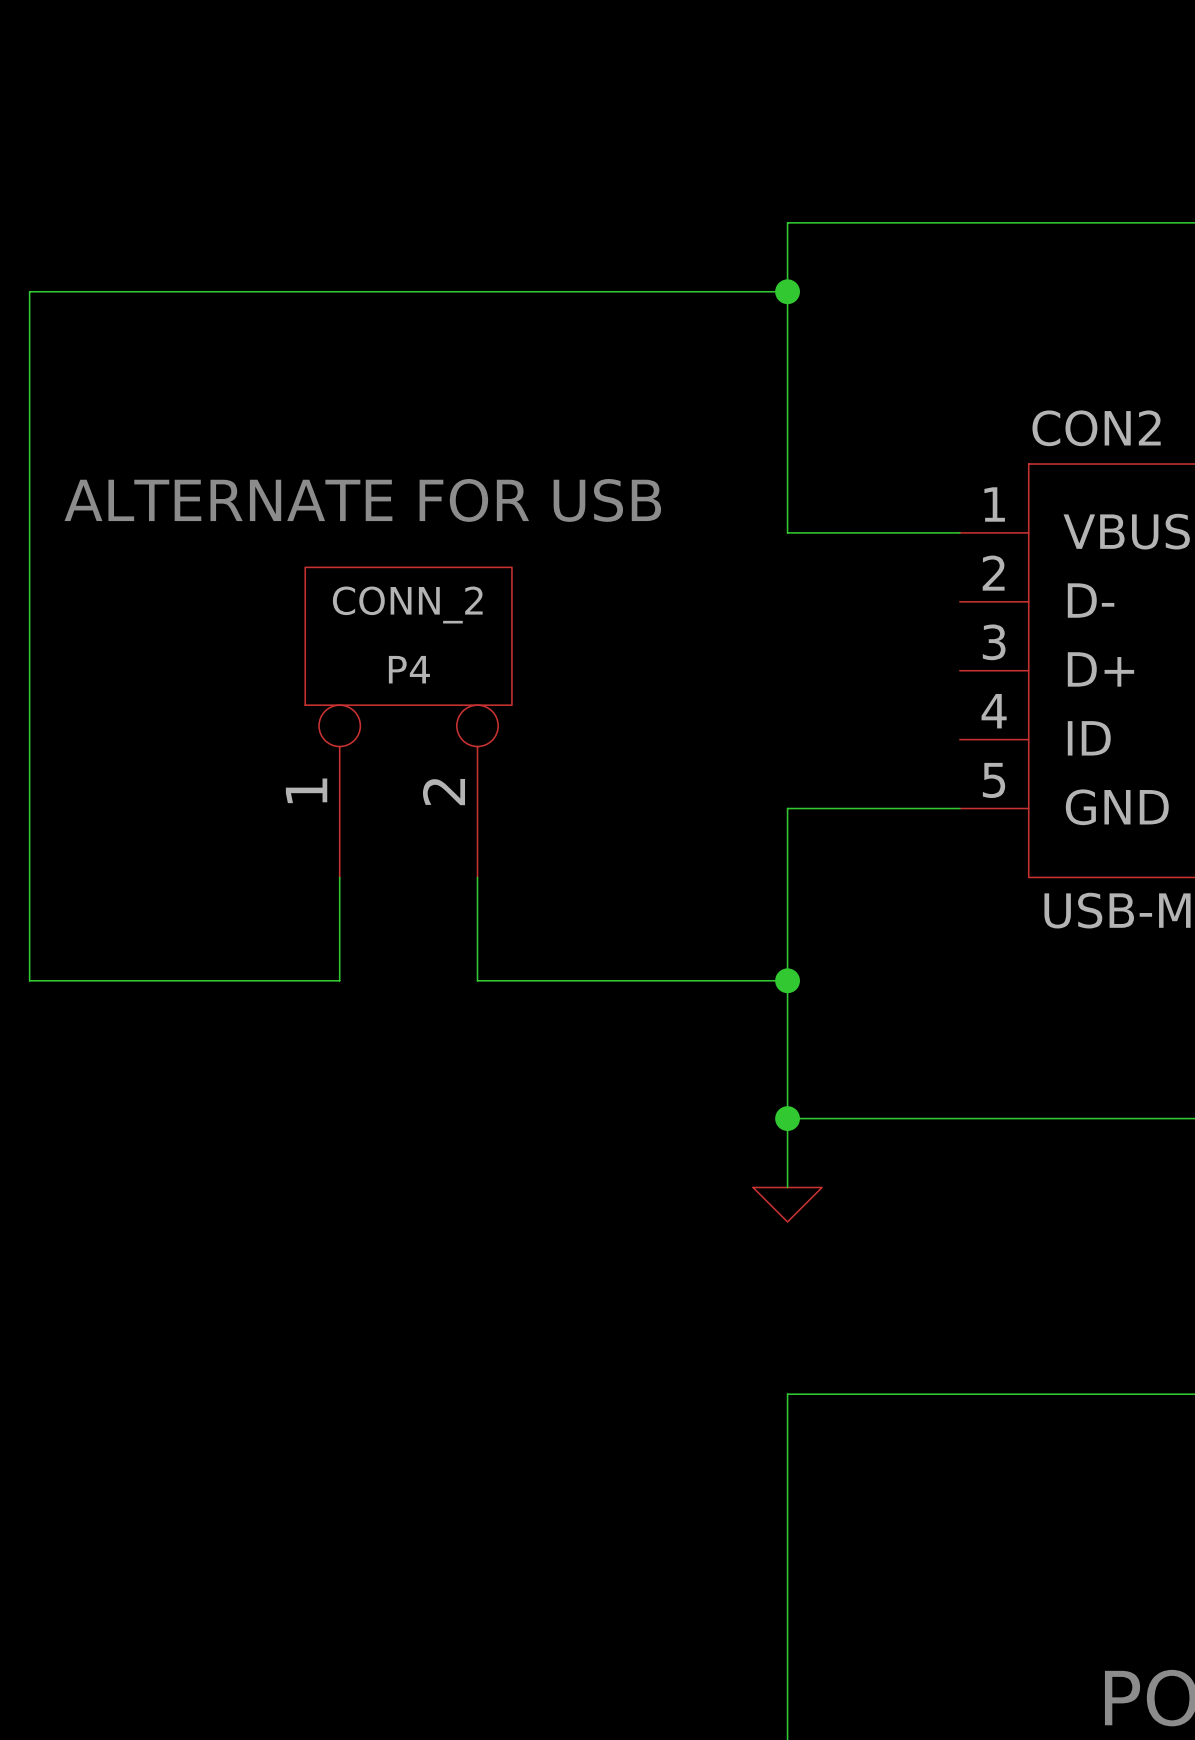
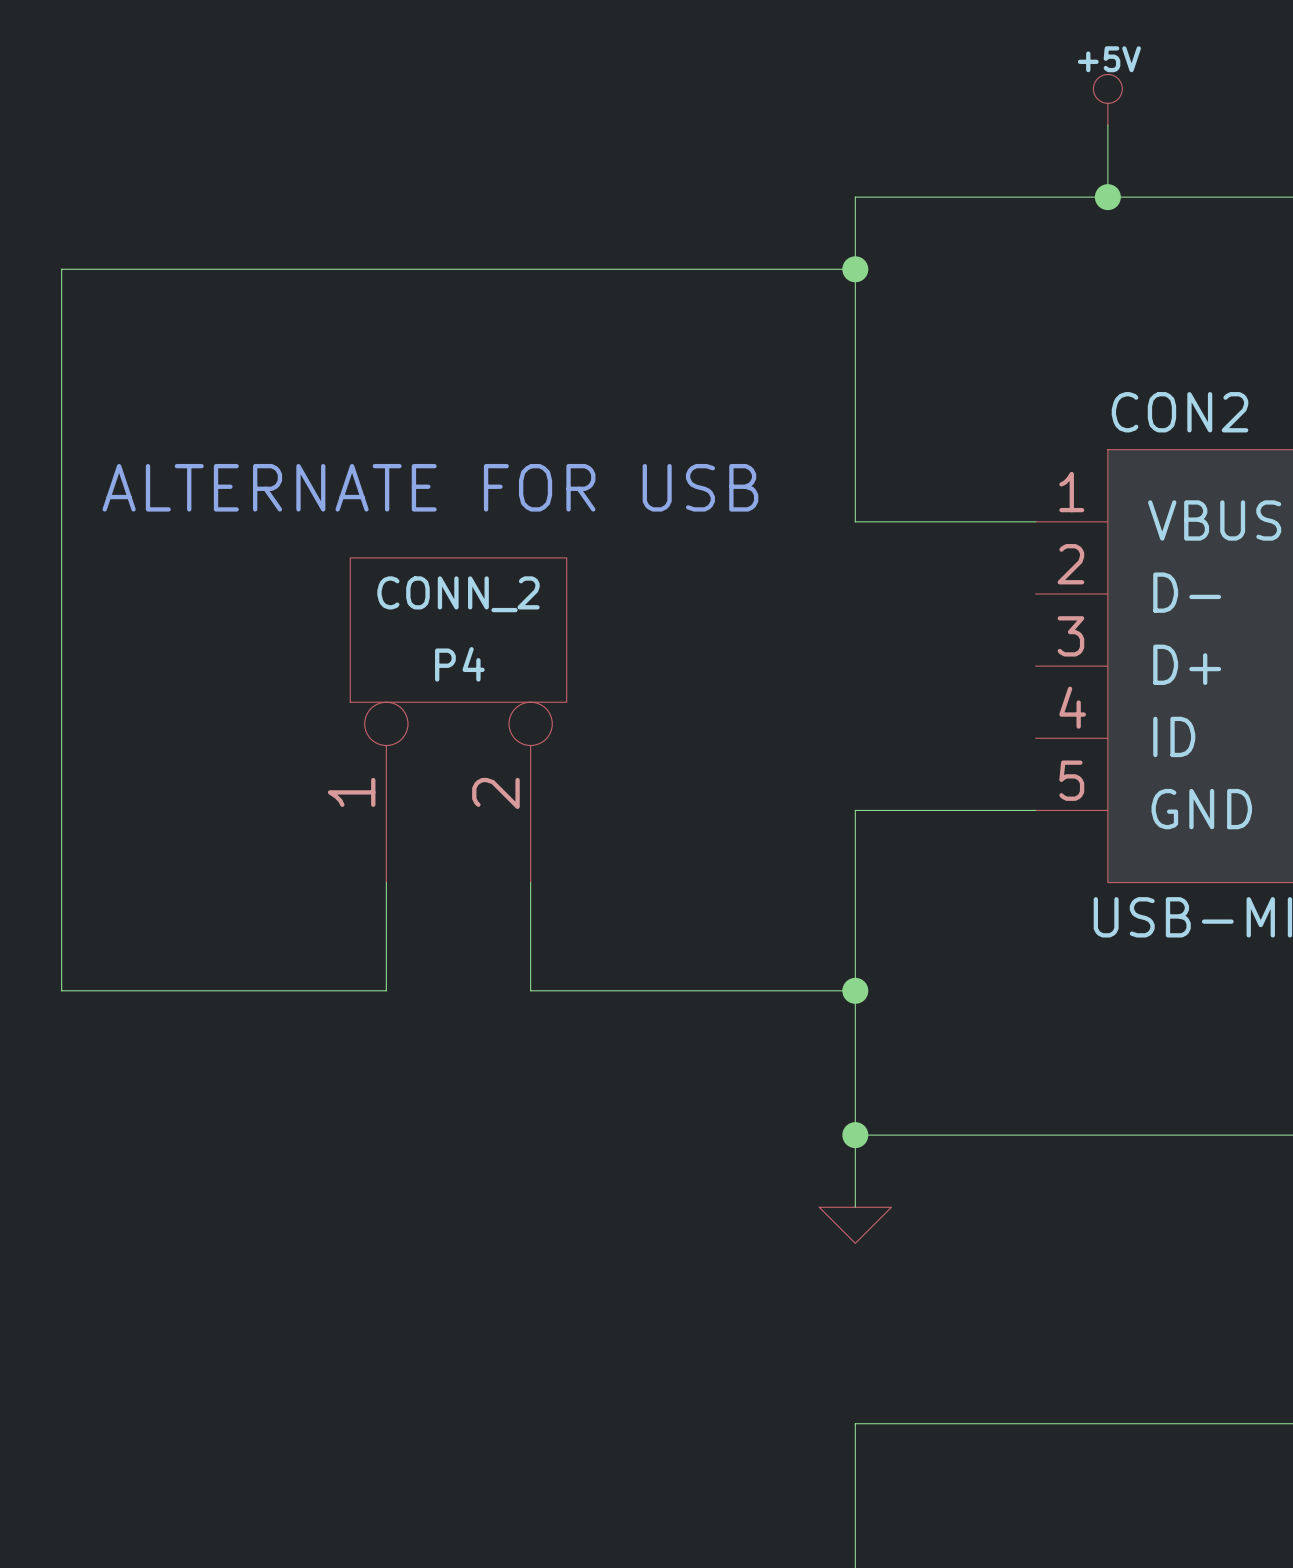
power symbol: none -> +5V (1107, 99)
wire: none -> (1107, 124) (1107, 197)
junction: none -> (1107, 197)

